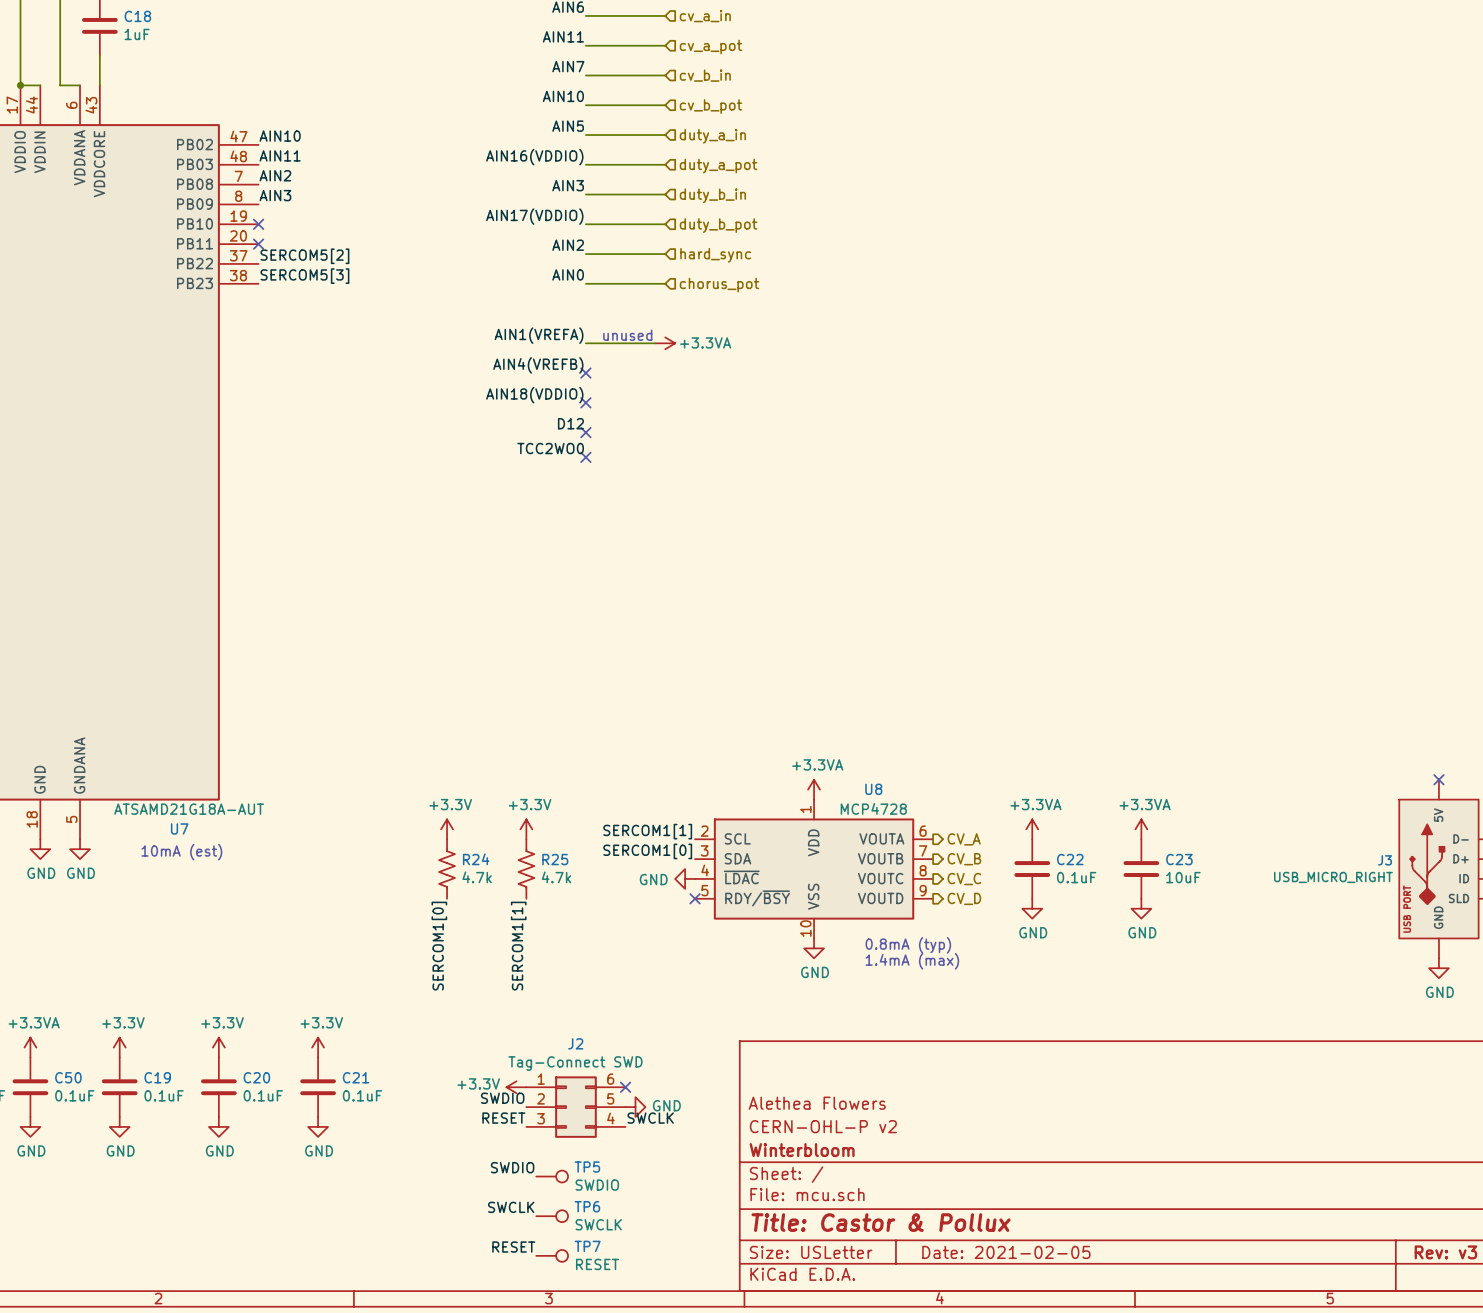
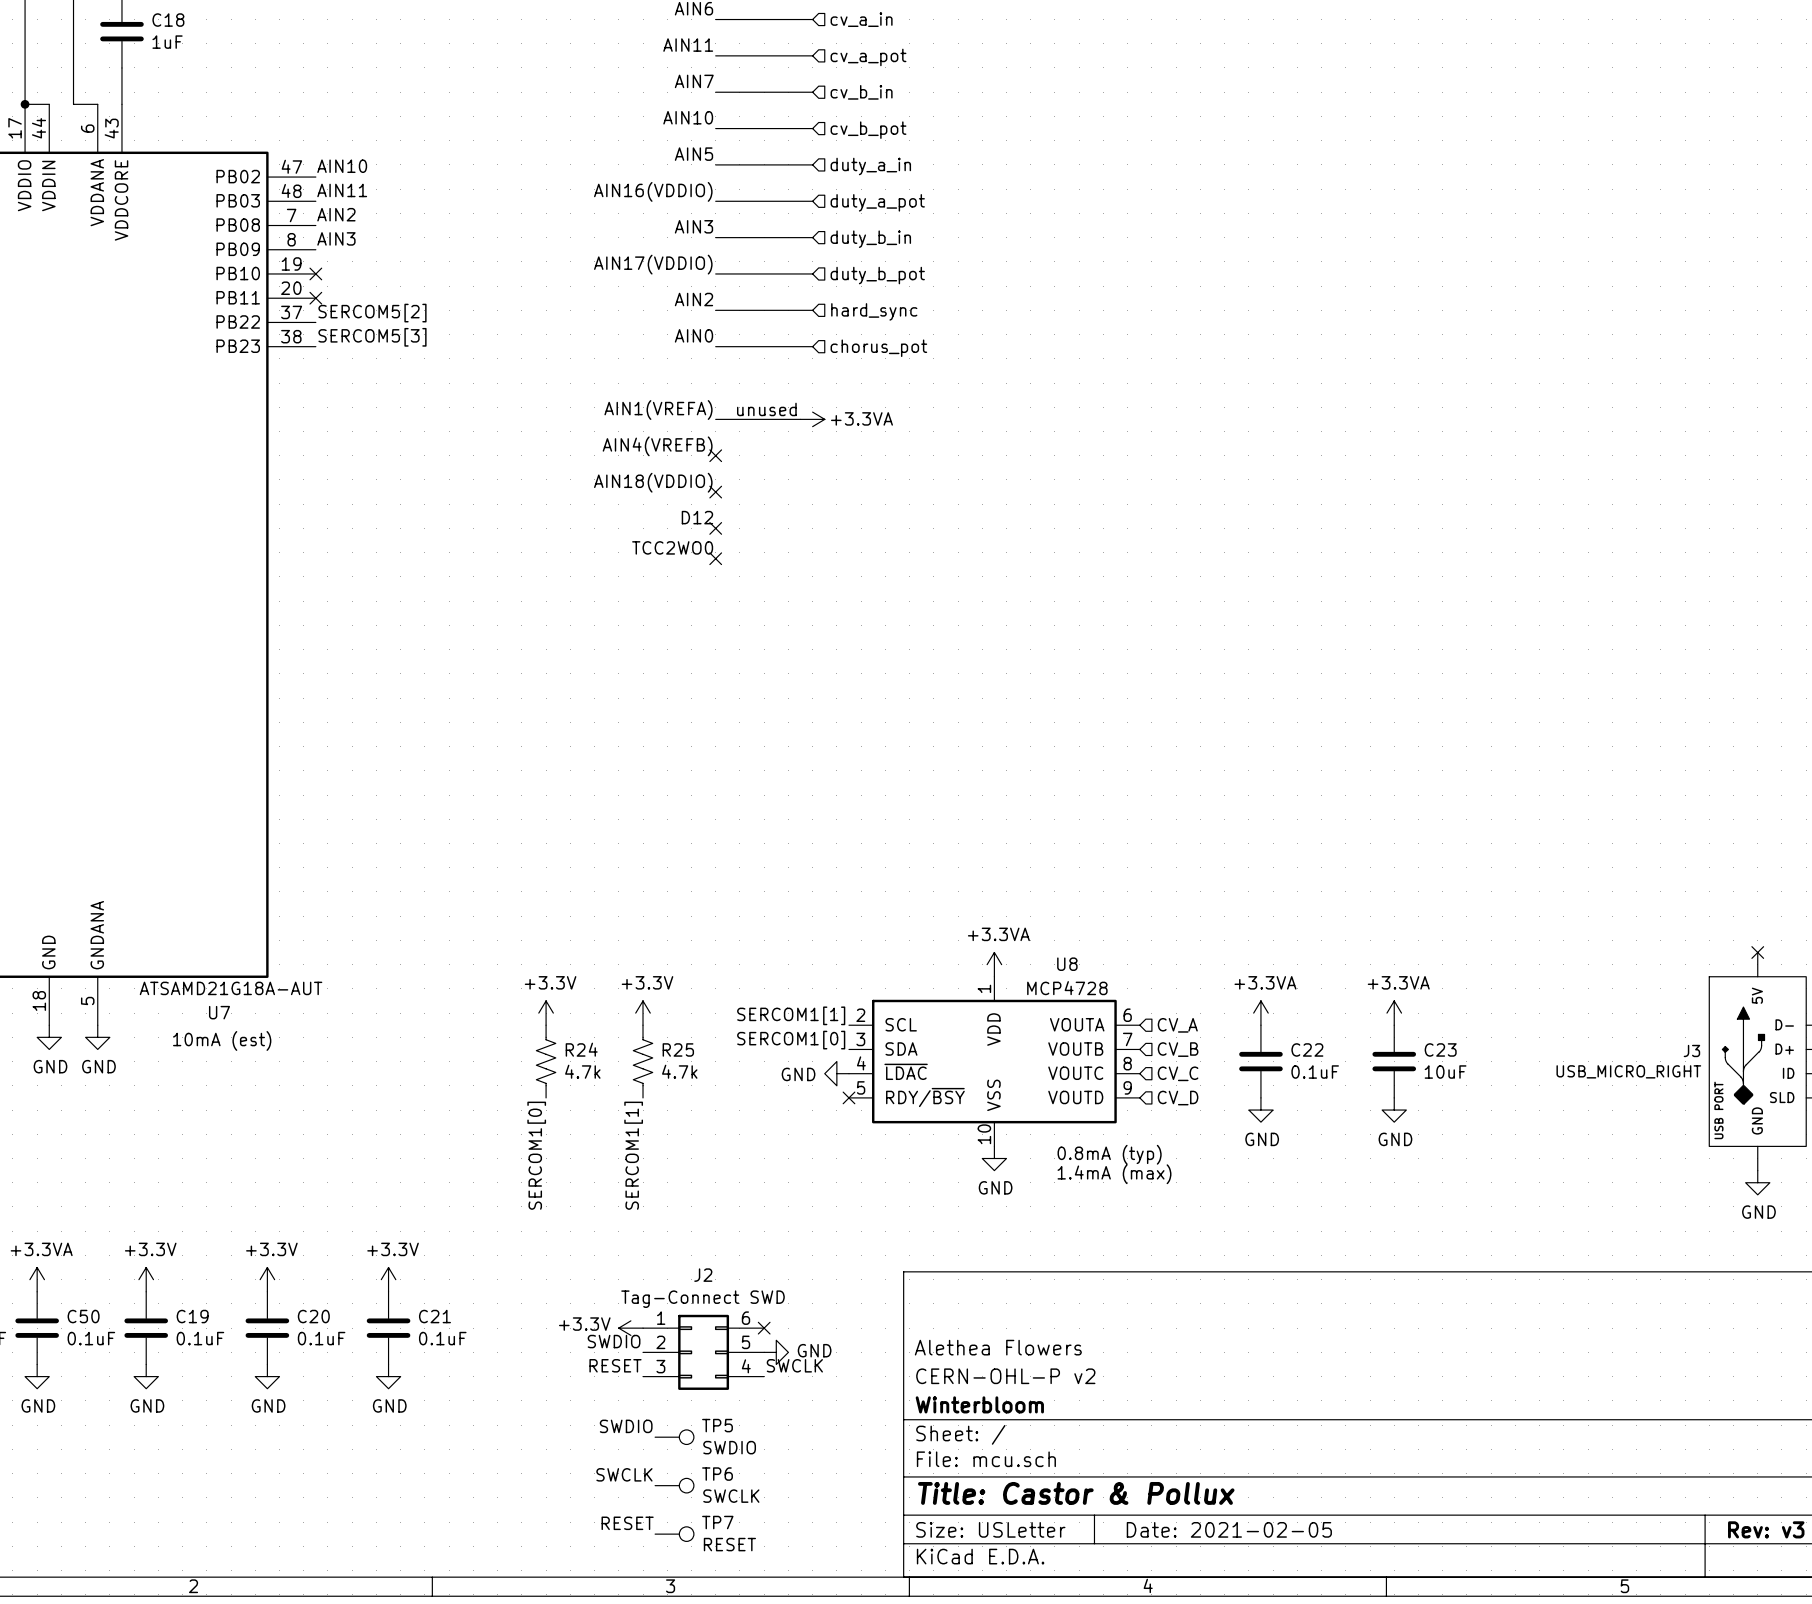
hierarchical label shape: output (964, 839) -> input (1177, 1025)
hierarchical label shape: output (964, 859) -> input (1178, 1049)
hierarchical label shape: output (964, 879) -> input (1178, 1073)
hierarchical label shape: output (964, 898) -> input (1178, 1098)

